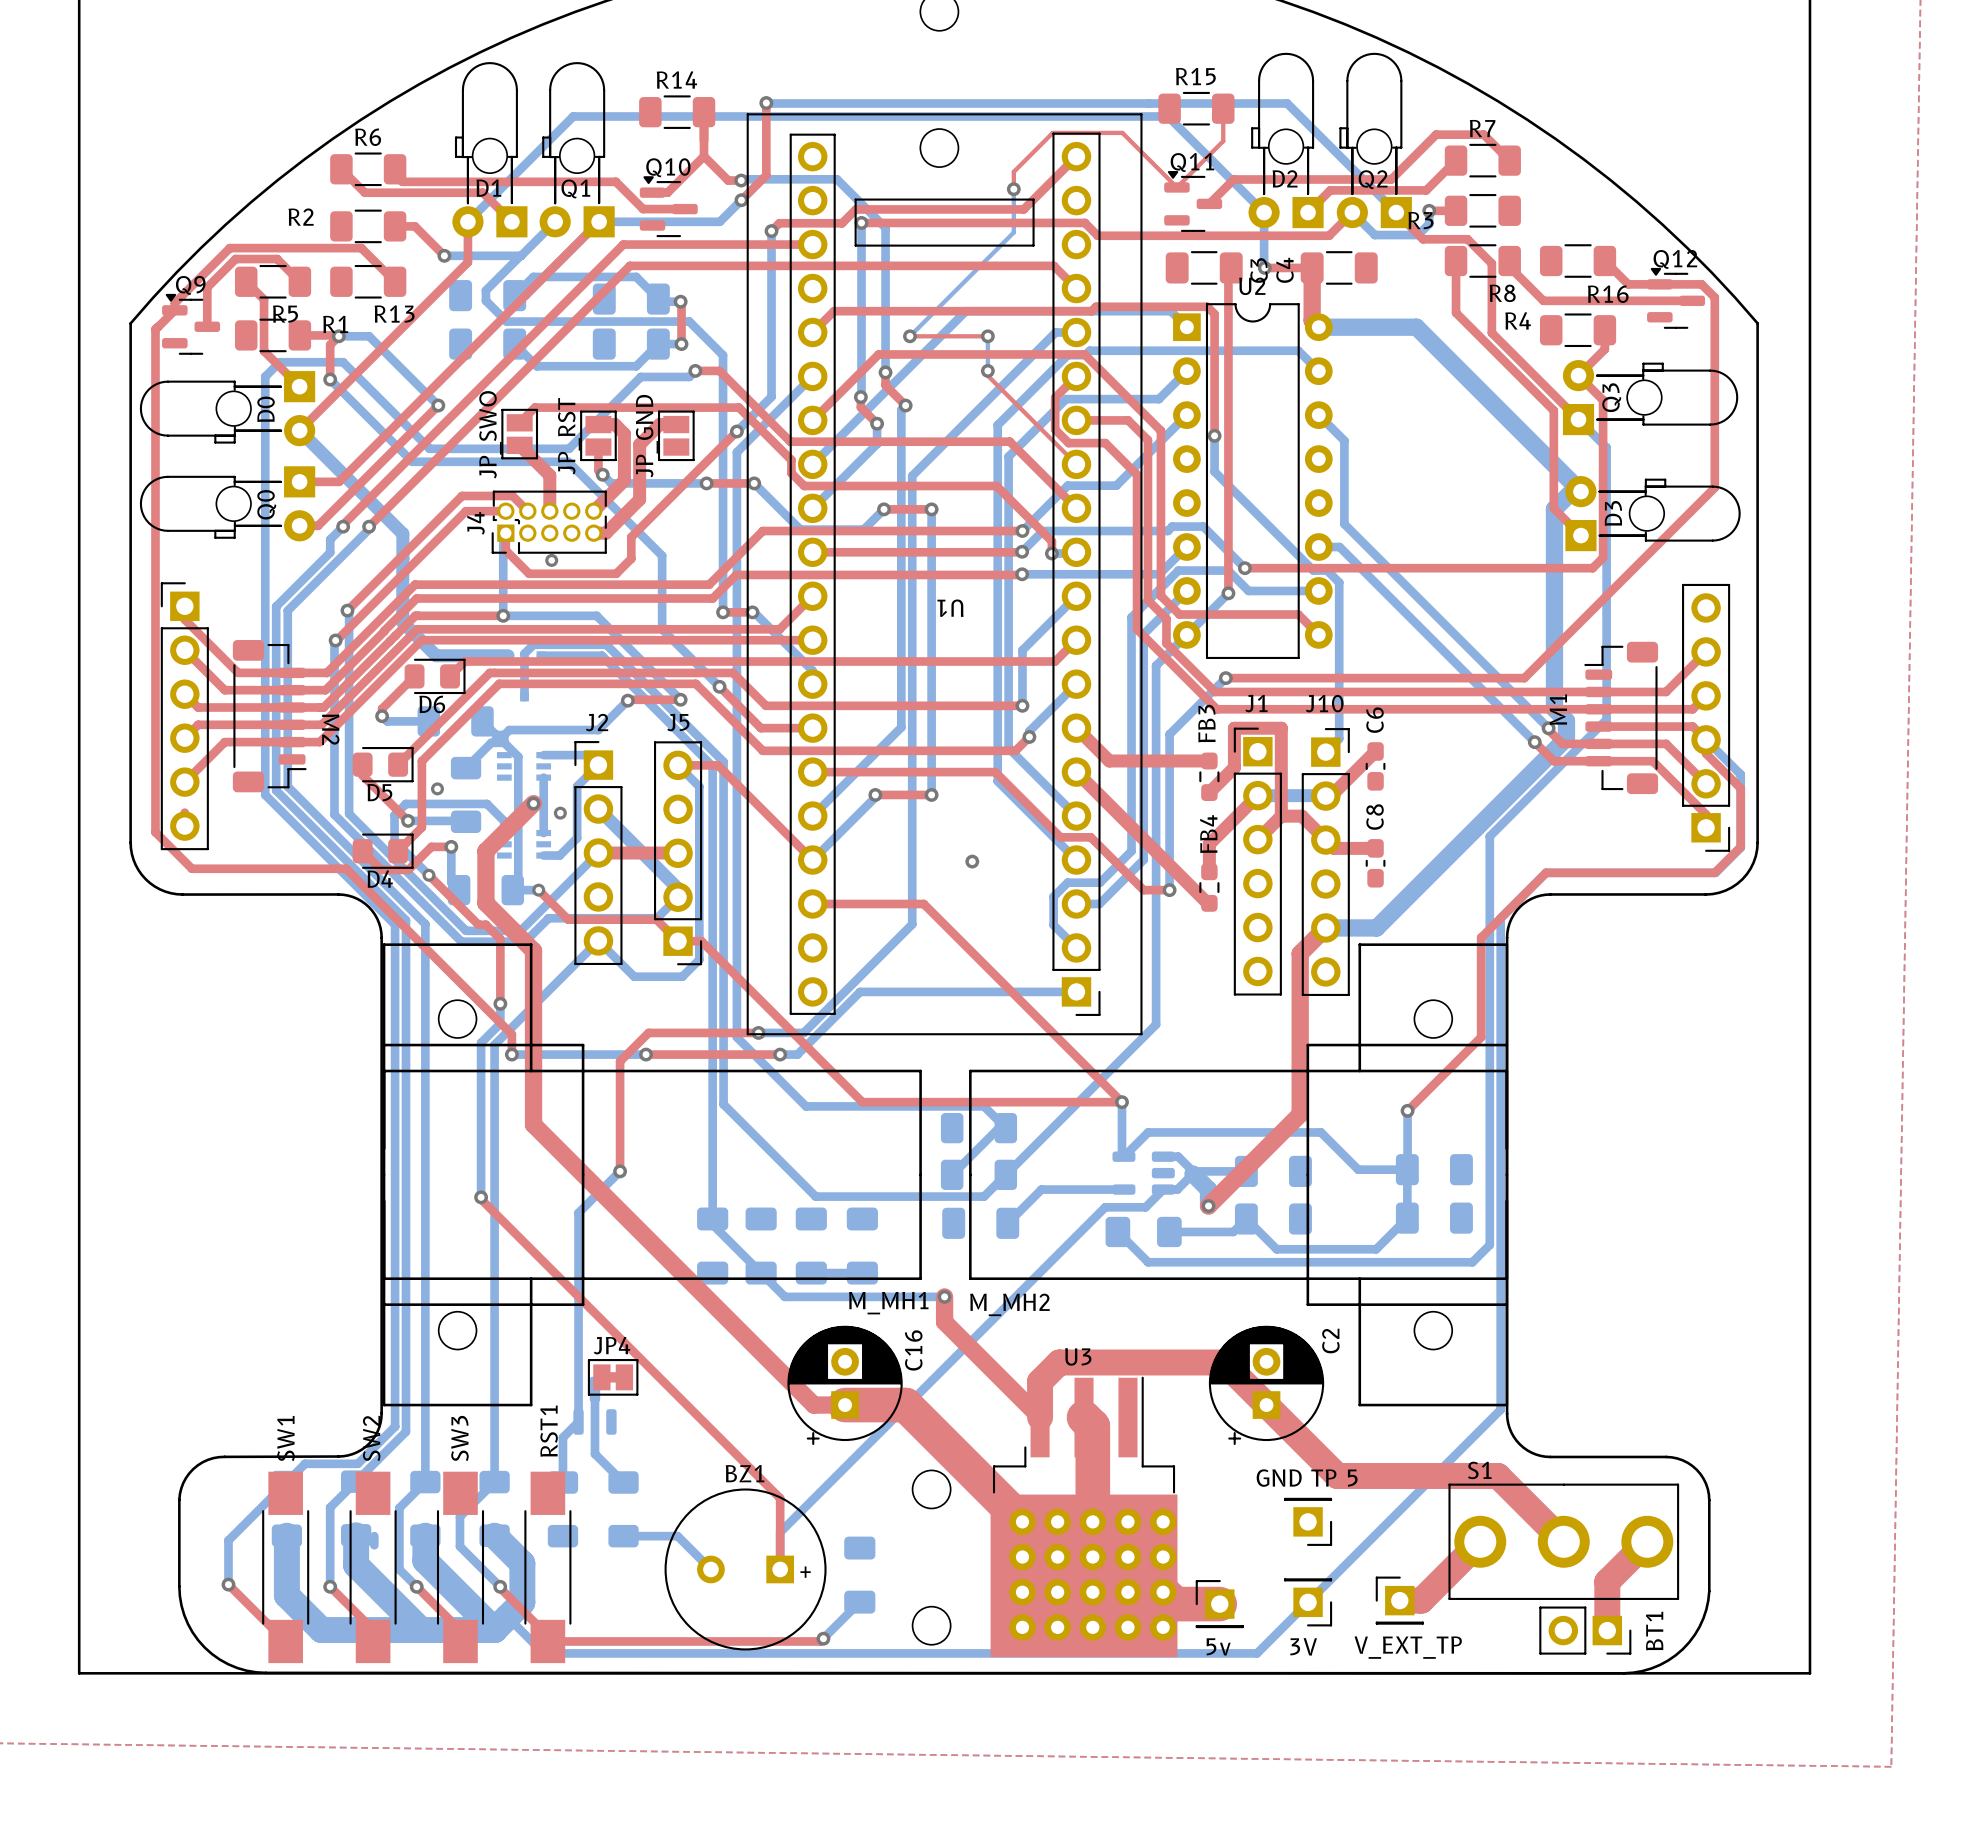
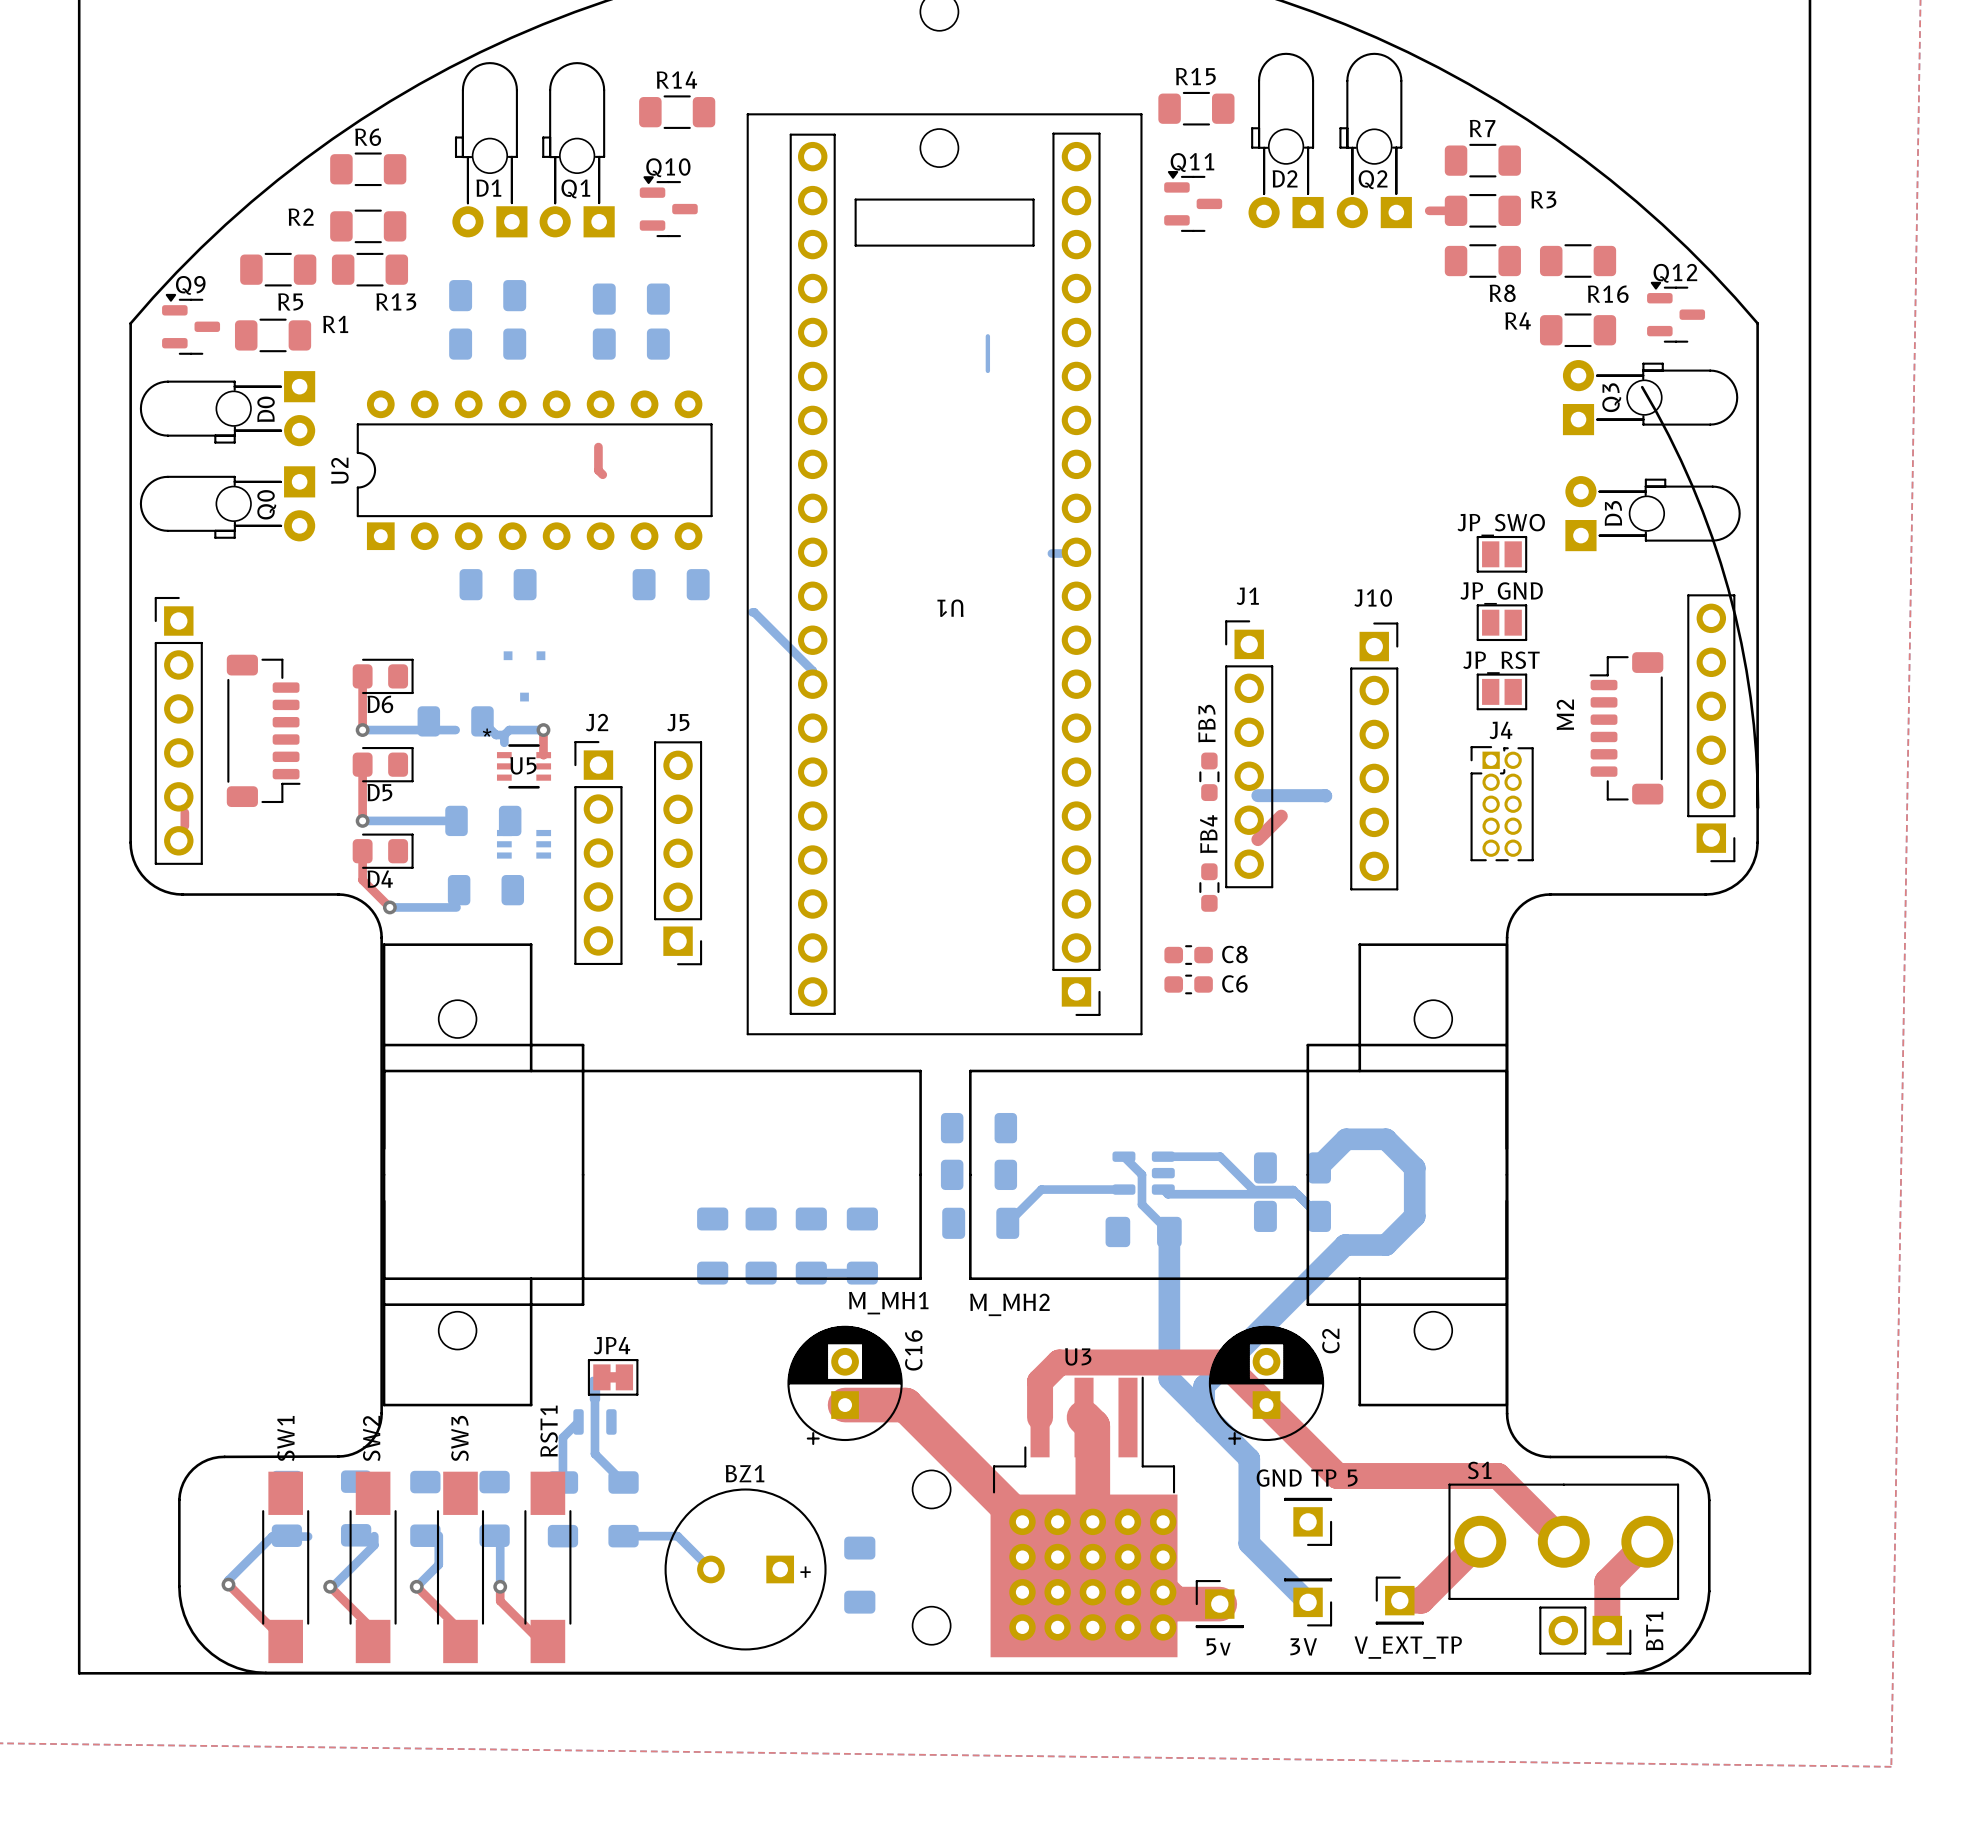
top track: (766, 102) (766, 175) (741, 200) -> none
bottom track: (766, 102) (1287, 103) (1396, 212) -> none
via: (766, 102) -> none
top track: (1223, 108) (1223, 141) (1176, 187) (1122, 132) (1052, 132) (1013, 171) (1013, 189) -> none
top track: (704, 112) (704, 156) -> none
top track: (704, 156) (728, 180) (741, 180) -> none
top track: (704, 156) (667, 192) (652, 192) -> none
top track: (1076, 156) (1023, 209) (855, 209) (842, 223) (779, 223) (771, 231) -> none
top track: (1456, 160) (1426, 190) (1330, 190) (1308, 212) -> none
top track: (1509, 160) (1483, 134) (1436, 134) (1391, 179) (1233, 179) (1209, 203) -> none
top track: (341, 169) (364, 192) (482, 192) (511, 221) -> none
top track: (395, 174) (402, 181) (615, 181) (643, 209) (684, 209) -> none
bottom track: (741, 180) (836, 179) (885, 227) (885, 372) -> none
via: (741, 180) -> none
bottom track: (1013, 189) (1013, 232) (909, 336) -> none
via: (1013, 189) -> none
bottom track: (741, 200) (719, 221) (599, 221) (525, 295) (514, 295) (533, 276) (636, 276) (660, 301) (680, 301) -> none
via: (741, 200) -> none
bottom track: (1429, 210) (1429, 223) (1418, 235) (1374, 235) (1352, 212) -> none
via: (1429, 210) -> none
top track: (1352, 212) (1329, 235) (1097, 235) (1084, 222) (861, 222) -> none
top track: (1396, 212) (1423, 239) (1467, 239) (1491, 263) (1491, 332) (1578, 419) -> none
R3 name position: R3 (1420, 220) -> R3 (1543, 199)
top track: (467, 221) (467, 262) (299, 430) -> none
bottom track: (467, 221) (573, 116) (1168, 116) (1264, 212) (1264, 267) -> none
bottom track: (555, 221) (521, 255) (444, 255) -> none
top track: (599, 221) (339, 481) (299, 481) -> none
bottom track: (861, 222) (860, 397) -> none
via: (861, 222) -> none
top track: (395, 226) (414, 226) (444, 255) -> none
bottom track: (771, 231) (771, 396) (736, 431) -> none
via: (771, 231) -> none
top track: (812, 244) (623, 244) (343, 526) -> none
via: (444, 255) -> none
bottom track: (520, 255) (485, 290) (485, 300) (506, 321) (689, 321) (723, 355) (723, 612) -> none
top track: (1456, 261) (1456, 312) (1553, 410) (1553, 508) (1580, 535) -> none
top track: (1509, 261) (1509, 267) (1543, 300) (1692, 300) -> none
top track: (1604, 261) (1628, 284) (1701, 284) (1714, 297) (1714, 487) (1524, 678) (1225, 678) -> none
C3: (1204, 267) -> none
top track: (1231, 267) (1228, 270) (1228, 593) -> none
top track: (1264, 267) (1312, 267) (1312, 320) (1318, 327) -> none
via: (1264, 267) -> none
C4: (1339, 267) -> none
top track: (246, 281) (264, 299) (264, 351) (299, 386) -> none
R5 position: (273, 281) -> (278, 269)
top track: (299, 281) (277, 259) (235, 259) (207, 287) (207, 326) -> none
R13 position: (368, 281) -> (369, 269)
top track: (395, 281) (361, 248) (229, 248) (174, 303) (174, 310) -> none
top track: (1076, 288) (1053, 265) (629, 265) (369, 526) -> none
Q12 position: (1676, 298) -> (1676, 312)
top track: (680, 301) (681, 344) -> none
via: (680, 301) -> none
top track: (174, 310) (155, 329) (155, 832) (191, 868) (346, 868) (511, 1034) (511, 1054) -> none
bottom track: (1186, 327) (1170, 311) (965, 311) (812, 464) -> none
bottom track: (1318, 327) (1416, 327) (1580, 491) (1571, 491) (1554, 509) (1554, 708) (1566, 720) (1566, 738) (1376, 927) (1325, 927) -> none
top track: (1604, 330) (1604, 349) (1578, 375) (1603, 400) (1603, 557) (1592, 568) (1244, 568) -> none
top track: (812, 332) (834, 311) (1091, 311) (1096, 306) (1207, 306) (1214, 314) (1214, 435) -> none
bottom track: (1076, 332) (1055, 332) (912, 475) (912, 924) (803, 1032) (758, 1032) -> none
top track: (299, 335) (338, 336) (330, 344) (330, 379) -> none
bottom track: (338, 336) (369, 336) (438, 405) -> none
via: (338, 336) -> none
top track: (909, 336) (987, 336) -> none
via: (909, 336) -> none
via: (987, 336) -> none
bottom track: (514, 344) (536, 366) (636, 366) (658, 344) (681, 344) -> none
via: (681, 344) -> none
top track: (695, 370) (719, 370) (790, 441) (1009, 441) (1076, 508) -> none
bottom track: (695, 370) (689, 376) (640, 376) (569, 448) (429, 448) (343, 362) (279, 362) (265, 376) (265, 794) (395, 924) (395, 1426) (357, 1463) (305, 1463) (228, 1540) (228, 1580) -> (308, 1536) (272, 1536) (228, 1580)
via: (695, 370) -> none
top track: (987, 370) (987, 375) (1076, 464) -> none
via: (987, 370) -> none
bottom track: (1186, 371) (1158, 399) (1066, 399) (1008, 456) (1008, 748) (1076, 816) -> none
bottom track: (1318, 371) (1298, 350) (1089, 350) (1085, 355) (1067, 355) (997, 425) (997, 781) (1076, 860) -> none
top track: (885, 372) (885, 385) (905, 405) -> none
via: (885, 372) -> none
bottom track: (812, 376) (736, 452) (736, 1037) (806, 1106) (984, 1106) (1005, 1128) (998, 1128) (952, 1174) -> none
top track: (1076, 376) (1055, 397) (1055, 429) (1068, 443) (1105, 443) (1137, 474) (1137, 629) (1216, 709) (1692, 709) (1706, 695) -> none
bottom track: (330, 379) (412, 461) (568, 461) (662, 555) (662, 629) (719, 686) -> none
via: (330, 379) -> none
board edge: none -> (1642, 387) (1668, 435) (1692, 485) (1712, 537) (1728, 589) (1741, 643) (1750, 697) (1756, 752) (1758, 807)
top track: (860, 397) (860, 407) (877, 423) -> none
via: (860, 397) -> none
top track: (438, 405) (318, 525) (299, 525) -> none
via: (438, 405) -> none
bottom track: (905, 405) (901, 409) (901, 727) (812, 816) -> none
via: (905, 405) -> none
bottom track: (1186, 415) (1116, 485) (1067, 485) (1022, 531) -> none
bottom track: (1318, 415) (1344, 440) (1344, 524) (1548, 728) -> none
bottom track: (1578, 419) (1606, 447) (1606, 719) (1489, 836) (1489, 1244) (1472, 1262) (1148, 1262) (1117, 1231) -> none
top track: (812, 420) (878, 354) (1084, 354) (1160, 430) (1160, 595) (1179, 614) (1298, 614) (1318, 634) -> none
top track: (1076, 420) (1128, 420) (1147, 440) (1147, 600) (1166, 618) (1166, 643) (1215, 691) (1666, 691) (1706, 651) -> none
top track: (519, 422) (534, 407) (738, 407) (791, 460) (791, 473) (804, 486) (996, 486) (1051, 541) (1051, 553) -> none
bottom track: (877, 423) (877, 443) (812, 508) -> none
via: (877, 423) -> none
top track: (598, 424) (615, 424) (624, 433) (624, 480) (593, 511) -> none
top track: (676, 424) (659, 424) (639, 444) (639, 499) (606, 533) (593, 533) -> none
bottom track: (299, 430) (402, 533) (402, 558) -> none
top track: (736, 431) (631, 537) (631, 558) (616, 573) (529, 573) (505, 550) (505, 533) -> none
via: (736, 431) -> none
JP_SWO: (519, 434) -> none
JP_RST: (598, 435) -> none
JP_GND: (676, 435) -> none
bottom track: (1214, 435) (1214, 471) (1313, 570) (1327, 570) (1339, 582) (1339, 738) (1325, 752) -> none
via: (1214, 435) -> none
top track: (519, 445) (549, 475) (549, 511) -> none
bottom track: (602, 474) (611, 483) (706, 483) -> none
via: (602, 474) -> none
U2 rotation: 0° (1252, 481) -> 90° counterclockwise (534, 470)
U2 position: (1252, 481) -> (534, 470)
top track: (706, 483) (754, 483) -> none
via: (706, 483) -> none
bottom track: (754, 483) (800, 529) (863, 529) (884, 509) -> none
via: (754, 483) -> none
top track: (884, 509) (931, 509) -> none
via: (884, 509) -> none
bottom track: (931, 509) (931, 794) -> none
via: (931, 509) -> none
top track: (505, 511) (465, 511) (335, 640) -> none
top track: (527, 511) (512, 495) (462, 495) (347, 610) -> none
J4 rotation: 0° (549, 522) -> 90° clockwise (1502, 803)
J4 position: (549, 522) -> (1502, 803)
bottom track: (343, 526) (330, 539) (330, 552) (276, 606) (276, 790) (405, 920) (405, 1431) (330, 1507) (330, 1586) -> none
via: (343, 526) -> none
bottom track: (369, 526) (369, 529) (287, 610) (287, 786) (425, 924) (425, 1482) (399, 1508) (399, 1569) (416, 1586) -> (438, 1535) (438, 1564) (416, 1586)
via: (369, 526) -> none
top track: (1022, 531) (762, 531) (709, 584) (415, 584) (326, 672) (238, 672) (184, 619) (184, 606) -> none
via: (1022, 531) -> none
bottom track: (505, 533) (503, 535) (503, 615) (596, 615) (680, 699) -> none
bottom track: (1186, 547) (1159, 574) (1022, 574) -> none
bottom track: (1318, 547) (1339, 547) (1534, 742) -> none
top track: (1022, 551) (812, 552) -> none
bottom track: (1022, 551) (1042, 531) (1167, 531) (1172, 526) (1203, 526) (1244, 568) -> none
via: (1022, 551) -> none
via: (1051, 553) -> none
JP_SWO: none -> (1501, 554)
bottom track: (402, 558) (402, 622) (436, 655) (508, 655) -> none
via: (551, 560) -> none
via: (1244, 568) -> none
top track: (1022, 574) (736, 574) (712, 598) (416, 598) (325, 690) (224, 690) (184, 650) -> none
via: (1022, 574) -> none
part: none -> (498, 584)
part: none -> (671, 584)
bottom track: (1186, 590) (1143, 634) (1143, 859) (1099, 903) (1076, 903) -> none
bottom track: (1318, 590) (1248, 590) (1228, 570) (1178, 570) (1131, 617) (1131, 851) (1100, 882) (1067, 882) (1053, 896) (1053, 925) (1076, 947) -> none
bottom track: (1228, 593) (1156, 665) (1156, 1024) (984, 1196) (815, 1196) (723, 1104) (723, 761) (606, 644) (533, 644) (524, 653) (524, 697) -> none
via: (1228, 593) -> none
top track: (812, 596) (779, 629) (417, 629) (321, 724) (198, 724) (184, 738) -> none
bottom track: (1076, 596) (1022, 650) (1022, 705) -> none
bottom track: (347, 610) (349, 612) (349, 813) (466, 930) (520, 930) (598, 853) -> none
via: (347, 610) -> none
top track: (723, 612) (752, 612) -> none
via: (723, 612) -> none
via: (752, 612) -> none
top track: (503, 615) (415, 615) (323, 707) (198, 707) (184, 694) -> none
via: (503, 615) -> none
JP_GND: none -> (1501, 622)
bottom track: (335, 640) (334, 814) (461, 941) (525, 941) (548, 918) (657, 918) (678, 897) (678, 888) (598, 809) -> none
via: (335, 640) -> none
top track: (812, 640) (421, 640) (319, 742) (224, 742) (184, 782) -> none
top track: (1076, 640) (1055, 661) (464, 661) (450, 676) -> none
bottom track: (540, 655) (602, 655) (712, 766) (712, 1224) (784, 1296) (944, 1296) -> none
top track: none -> (362, 676) (362, 730)
top track: (414, 676) (382, 708) (382, 716) -> none
D6 position: (435, 676) -> (383, 676)
bottom track: (1225, 678) (1169, 734) (1169, 890) -> none
via: (1225, 678) -> none
bottom track: (1076, 684) (1029, 731) (1029, 736) -> none
top track: (719, 686) (760, 728) (812, 728) -> none
via: (719, 686) -> none
JP_RST: none -> (1501, 691)
top track: (680, 699) (627, 700) -> none
via: (680, 699) -> none
bottom track: (627, 700) (598, 730) (543, 730) -> none
via: (627, 700) -> none
top track: (1022, 705) (765, 705) (733, 672) (489, 672) (398, 764) -> none
via: (1022, 705) -> none
M2 rotation: 0° (233, 716) -> 180° (1662, 728)
M2 position: (233, 716) -> (1662, 728)
bottom track: (382, 716) (387, 721) (428, 721) -> none
via position: (382, 716) -> (362, 730)
M1: (1657, 717) -> none
top track: (1598, 726) (1692, 726) (1706, 739) (1706, 753) (1740, 788) (1740, 846) (1714, 872) (1546, 872) (1481, 937) (1481, 1037) (1407, 1110) -> none
top track: (1076, 728) (1109, 760) (1209, 760) -> none
top track: (1548, 728) (1562, 743) (1666, 743) (1706, 783) -> none
via: (1548, 728) -> none
part: none -> (227, 730)
bottom track: none -> (362, 730) (455, 730)
top track: none -> (543, 730) (543, 754)
via: none -> (543, 730)
top track: (1029, 736) (1015, 750) (762, 750) (695, 683) (499, 683) (421, 761) (421, 827) (398, 851) -> none
via: (1029, 736) -> none
bottom track: (1706, 739) (1740, 774) (1740, 847) (1715, 872) (1546, 872) (1500, 918) (1500, 1409) (1257, 1653) (543, 1653) (507, 1617) -> none
top track: (1534, 742) (1553, 761) (1652, 761) (1706, 814) (1706, 827) -> none
via: (1534, 742) -> none
top track: (1375, 751) (1330, 796) (1325, 796) -> none
bottom track: (543, 755) (588, 755) (598, 765) (577, 786) (577, 838) (559, 855) (543, 855) -> none
top track: (678, 765) (718, 765) (812, 860) -> none
bottom track: (678, 765) (699, 786) (699, 959) (682, 976) (634, 976) (598, 940) (494, 1044) (494, 1482) (459, 1516) (459, 1546) (500, 1586) -> (500, 1535) (500, 1586)
U5 side: bottom (524, 766) -> top (524, 766)
C6 rotation: 0° (1375, 766) -> 90° clockwise (1188, 984)
C6 position: (1375, 766) -> (1188, 984)
bottom track: (466, 768) (491, 742) (504, 742) (518, 756) (518, 884) (512, 890) (538, 890) -> none
top track: (812, 772) (995, 772) (1060, 837) (1090, 837) (1143, 890) (1169, 890) -> none
top track: (1076, 772) (1209, 903) -> none
top track: (362, 775) (408, 820) -> (362, 775) (362, 820)
bottom track: (543, 777) (543, 833) -> none
via: (437, 788) -> none
top track: (1209, 792) (1234, 767) (1234, 728) (1281, 728) (1281, 816) (1301, 816) (1334, 848) (1375, 848) -> none
part rotation: 0° (466, 794) -> 90° clockwise (483, 820)
top track: (875, 794) (931, 794) -> none
bottom track: (875, 794) (875, 797) (812, 860) -> none
via: (875, 794) -> none
via: (931, 794) -> none
top track: (1257, 795) (1209, 844) (1209, 871) -> none
top track: (533, 803) (485, 851) (485, 903) (533, 950) (533, 1124) (813, 1405) (845, 1405) -> none
via: (533, 803) -> none
via: (560, 813) -> none
bottom track: none -> (362, 820) (408, 820)
via: none -> (362, 820)
via: (408, 820) -> none
bottom track: (504, 833) (504, 821) (486, 803) (405, 803) (394, 815) (394, 840) (428, 875) -> none
top track: (451, 846) (431, 846) (408, 869) (381, 869) (362, 851) (369, 851) -> none
bottom track: (451, 846) (451, 882) (459, 889) -> none
via: (451, 846) -> none
top track: none -> (362, 851) (362, 880) (389, 907)
top track: (598, 853) (678, 853) -> none
via: (972, 861) -> none
J1 position: (1257, 861) -> (1249, 754)
J10 position: (1325, 862) -> (1374, 756)
C8 rotation: 0° (1375, 863) -> 90° clockwise (1188, 955)
C8 position: (1375, 863) -> (1188, 955)
top track: (428, 875) (478, 924) (485, 924) (500, 939) (500, 1003) -> none
via: (428, 875) -> none
top track: (538, 890) (568, 919) (656, 919) (678, 941) (701, 941) (862, 1102) (1122, 1102) (923, 903) (812, 903) -> none
via: (538, 890) -> none
via: (1169, 890) -> none
bottom track: none -> (389, 907) (456, 907)
via: none -> (389, 907)
top track: (1325, 927) (1300, 953) (1300, 1114) (1208, 1206) -> none
bottom track: (1076, 991) (860, 991) (797, 1054) (780, 1054) -> none
bottom track: (500, 1003) (500, 1023) (481, 1042) (481, 1197) -> none
via: (500, 1003) -> none
top track: (758, 1032) (648, 1032) (620, 1061) (620, 1171) -> none
via: (758, 1032) -> none
bottom track: (511, 1054) (646, 1054) -> none
via: (511, 1054) -> none
top track: (646, 1054) (780, 1054) -> none
via: (646, 1054) -> none
via: (780, 1054) -> none
bottom track: (1122, 1102) (1122, 1154) (1123, 1156) (1148, 1132) (1321, 1132) (1358, 1169) (1407, 1169) (1407, 1218) (1376, 1249) (1276, 1249) (1246, 1218) (1233, 1231) (1169, 1231) -> none
via: (1122, 1102) -> none
bottom track: (1407, 1110) (1407, 1169) -> none
via: (1407, 1110) -> none
bottom track: none -> (1123, 1156) (1141, 1174) (1141, 1204) (1169, 1231) (1169, 1378) (1249, 1458) (1249, 1543) (1308, 1602)
bottom track: (1178, 1156) (1192, 1171) -> (1178, 1156) (1220, 1156) (1253, 1190) (1293, 1190) (1319, 1216)
bottom track: none -> (1319, 1167) (1346, 1139) (1386, 1139) (1414, 1167) (1414, 1216) (1386, 1245) (1345, 1245) (1204, 1386) (1204, 1413)
part: (1434, 1169) -> none
bottom track: (620, 1171) (578, 1212) (578, 1421) -> none
via: (620, 1171) -> none
bottom track: (1192, 1171) (1246, 1171) -> none
part position: (1273, 1171) -> (1292, 1167)
bottom track: (1192, 1173) (1208, 1189) (1208, 1206) -> none
bottom track: (1192, 1173) (1177, 1189) (1163, 1189) (1145, 1207) (1105, 1207) (780, 1532) (780, 1569) -> none
bottom track: none -> (1163, 1189) (1167, 1194) (1297, 1194)
top track: (481, 1197) (780, 1498) (780, 1569) -> none
via: (481, 1197) -> none
via: (1208, 1206) -> none
part position: (1273, 1218) -> (1292, 1216)
part: (1434, 1218) -> none
top track: (944, 1296) (944, 1322) (1040, 1417) -> none
via: (944, 1296) -> none
bottom track: (286, 1535) (286, 1595) (321, 1630) (494, 1630) -> none
bottom track: (356, 1535) (356, 1565) (421, 1630) -> none
bottom track: (425, 1535) (425, 1560) (494, 1630) -> none
bottom track: (494, 1535) (522, 1563) (522, 1602) (494, 1630) -> none
bottom track: none -> (374, 1545) (332, 1586)
top track: (500, 1588) (547, 1635) (547, 1641) (820, 1641) (823, 1638) -> (500, 1588) (500, 1601) (540, 1641) (547, 1641)
bottom track: (859, 1602) (823, 1638) -> none
via: (823, 1638) -> none

